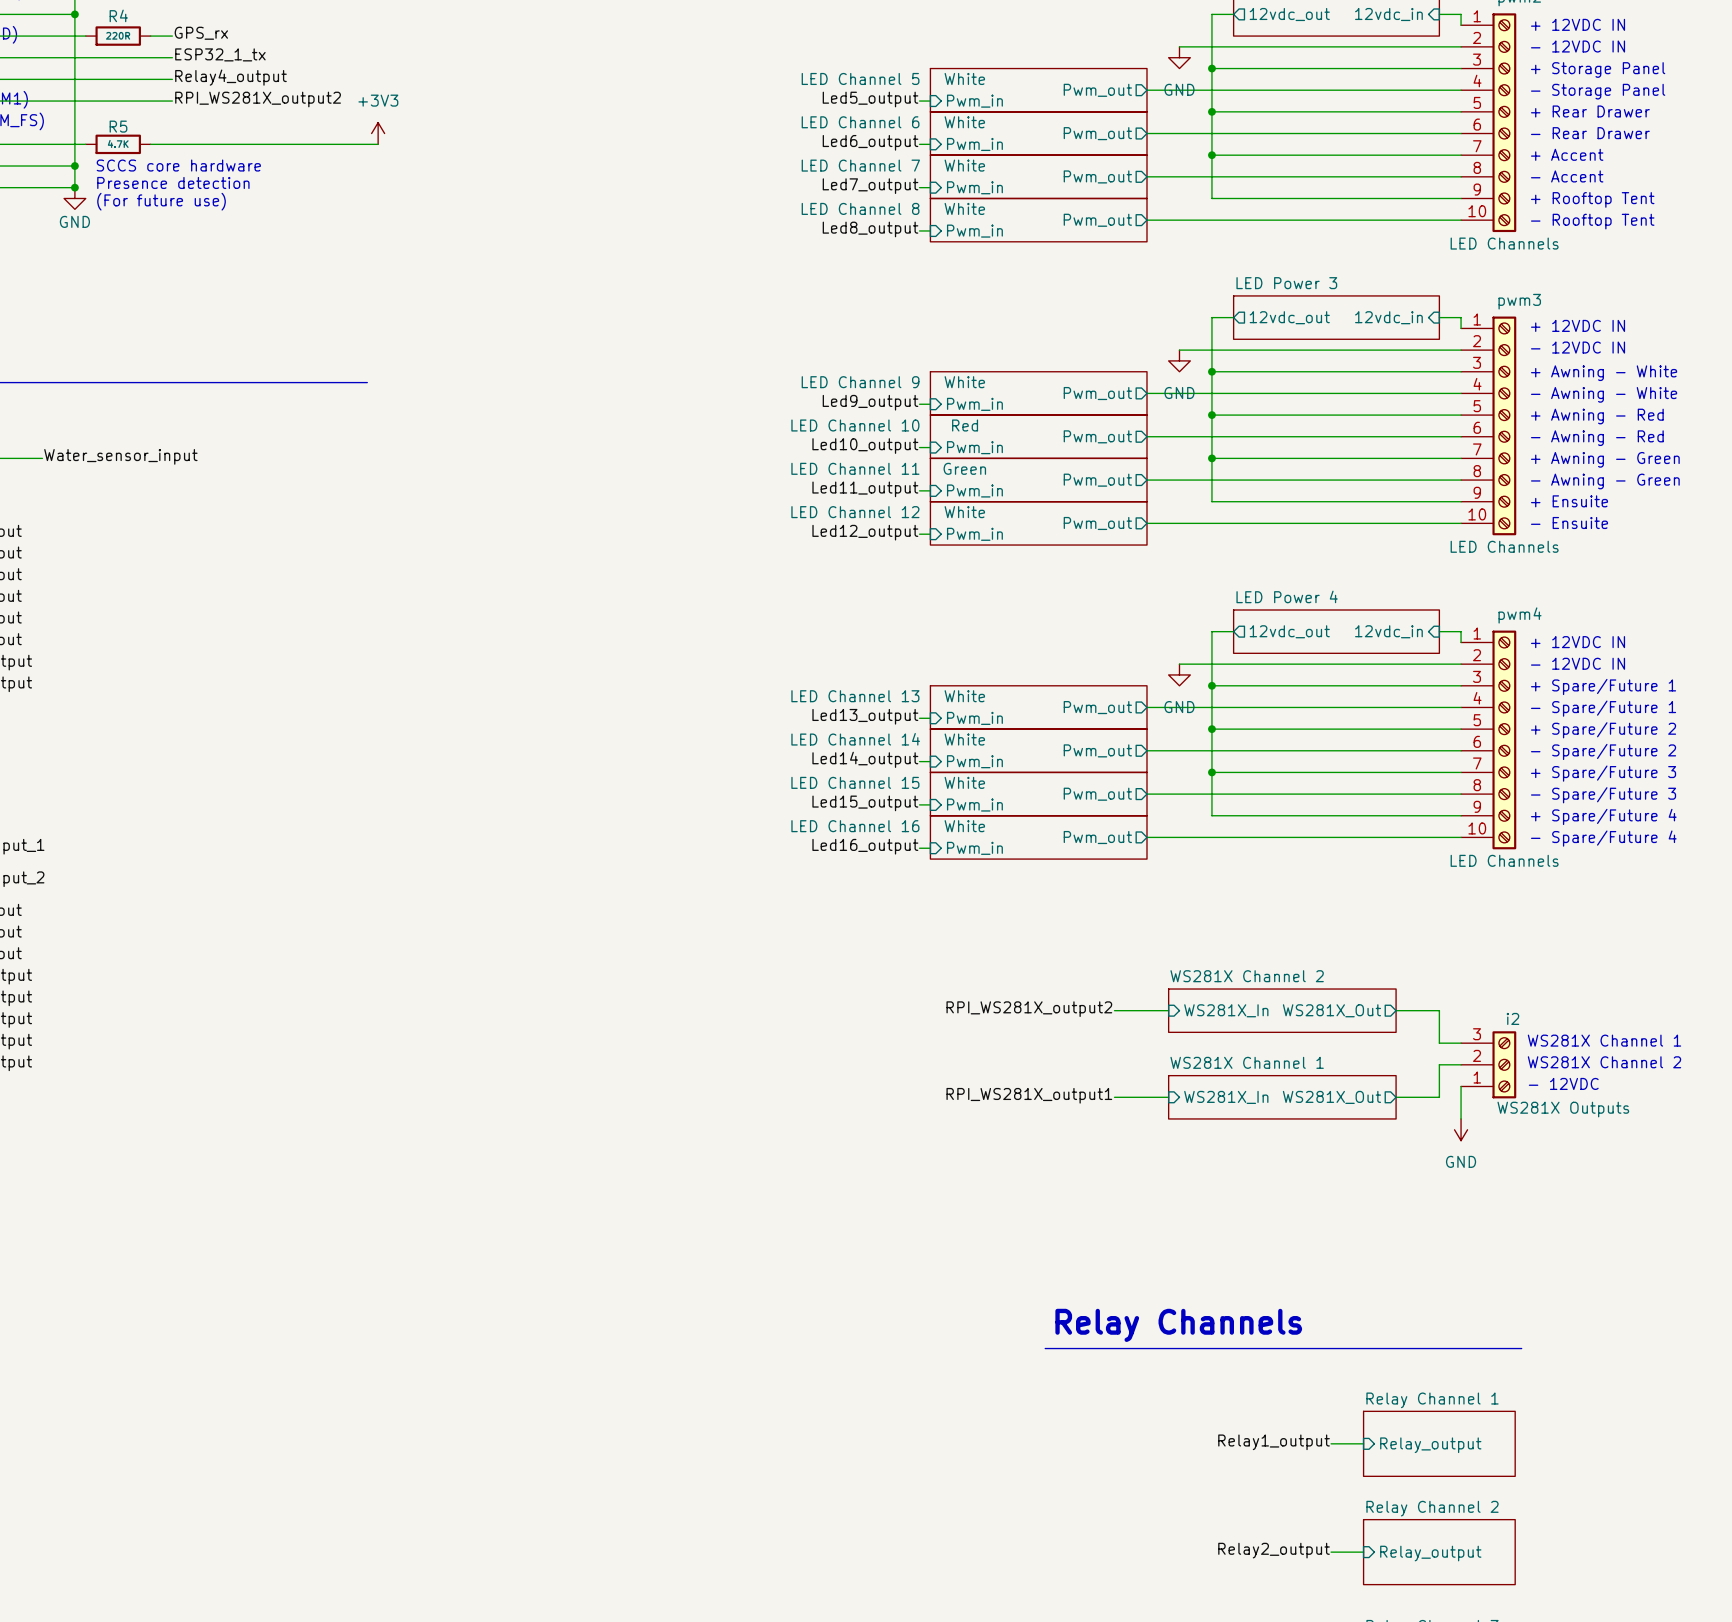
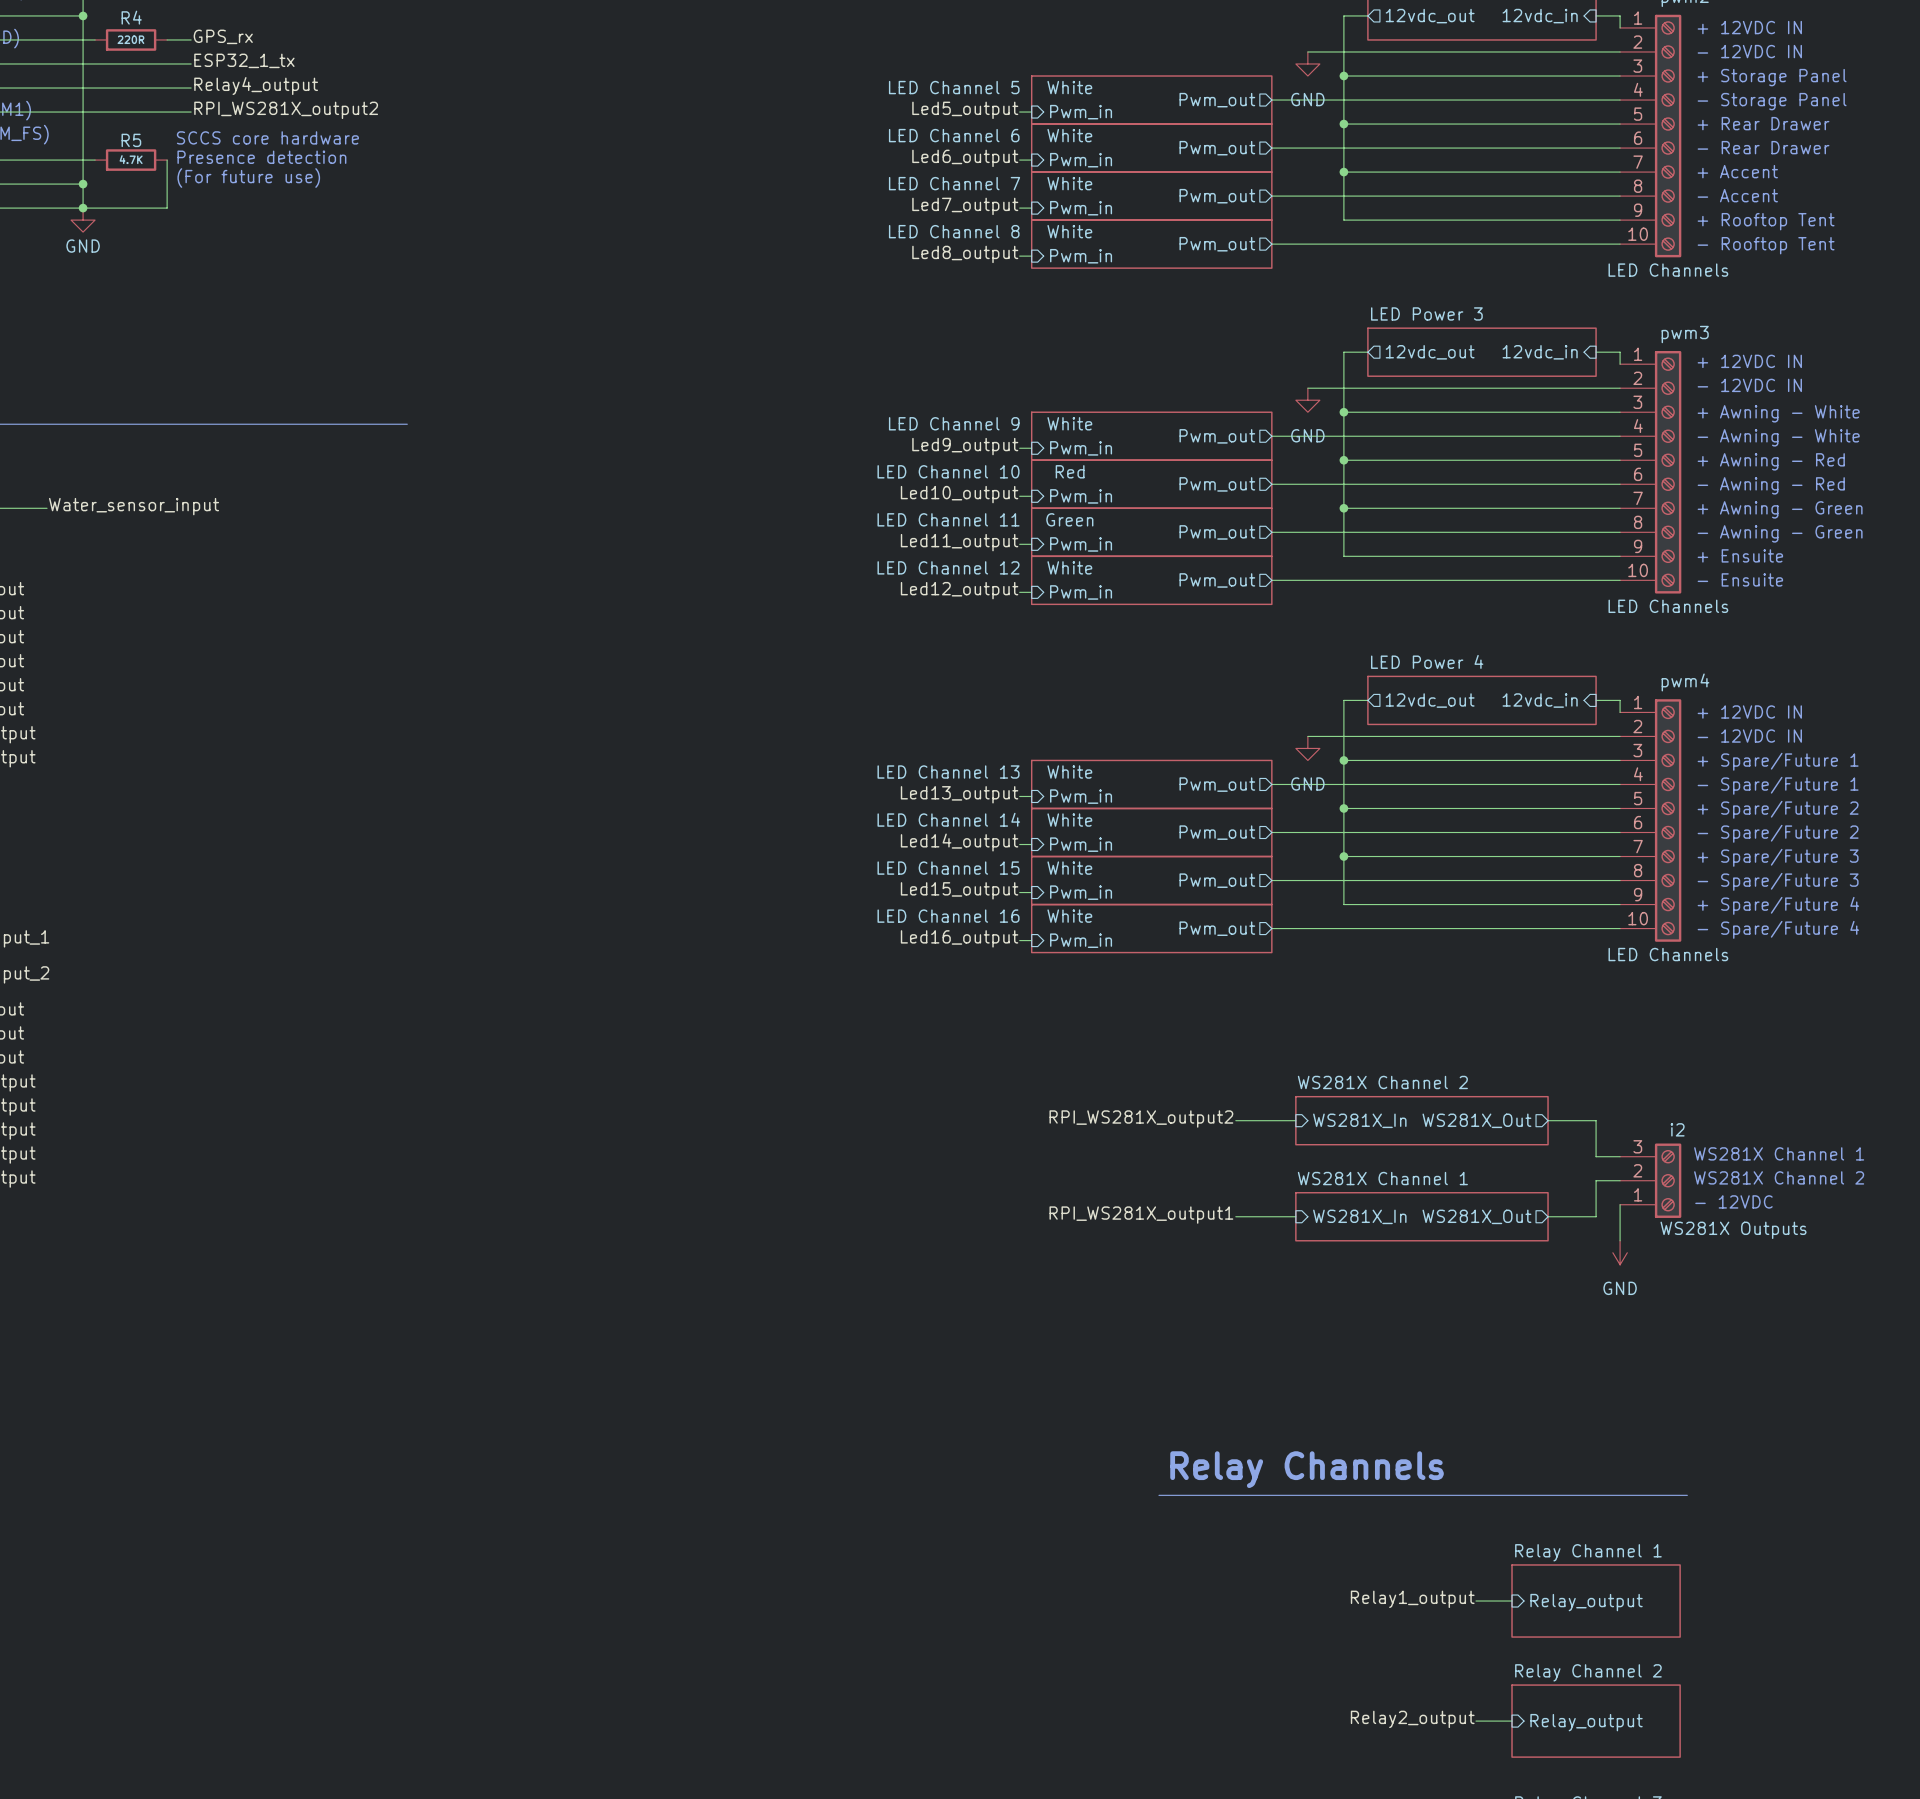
power symbol: +3V3 (378, 133) -> none
wire: (150, 144) (378, 144) -> (167, 160) (167, 208) (83, 208)
text position: SCCS core hardware (178, 165) -> SCCS core hardware (267, 137)
text position: Presence detection (173, 182) -> Presence detection (261, 157)
text position: (For future use) (161, 201) -> (For future use) (248, 178)

